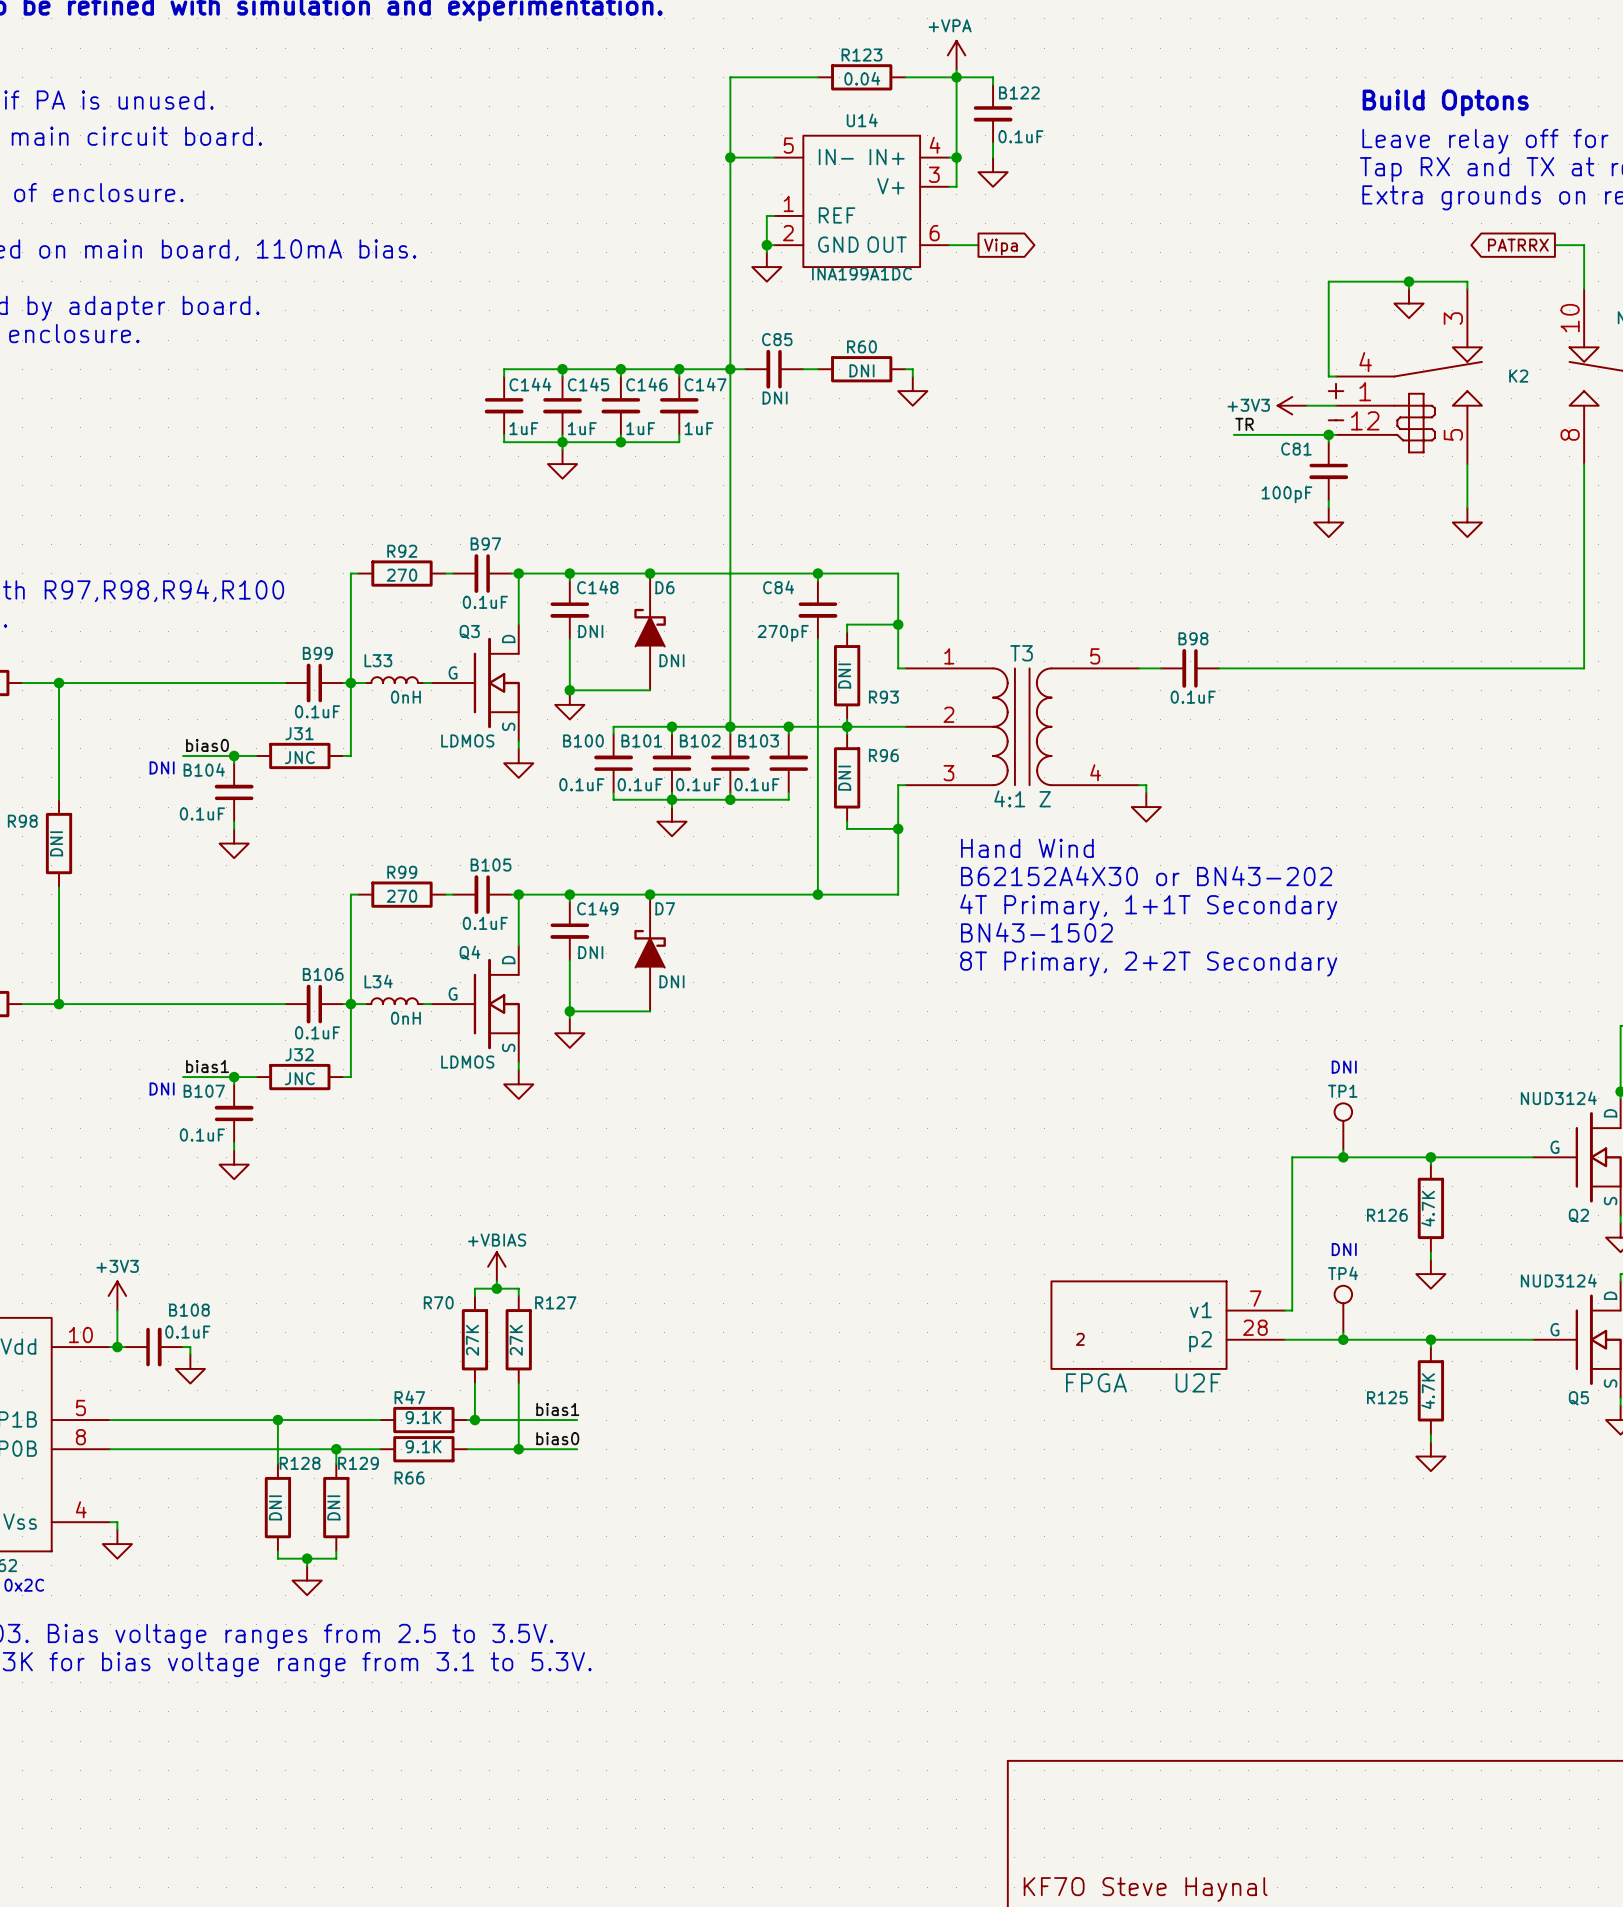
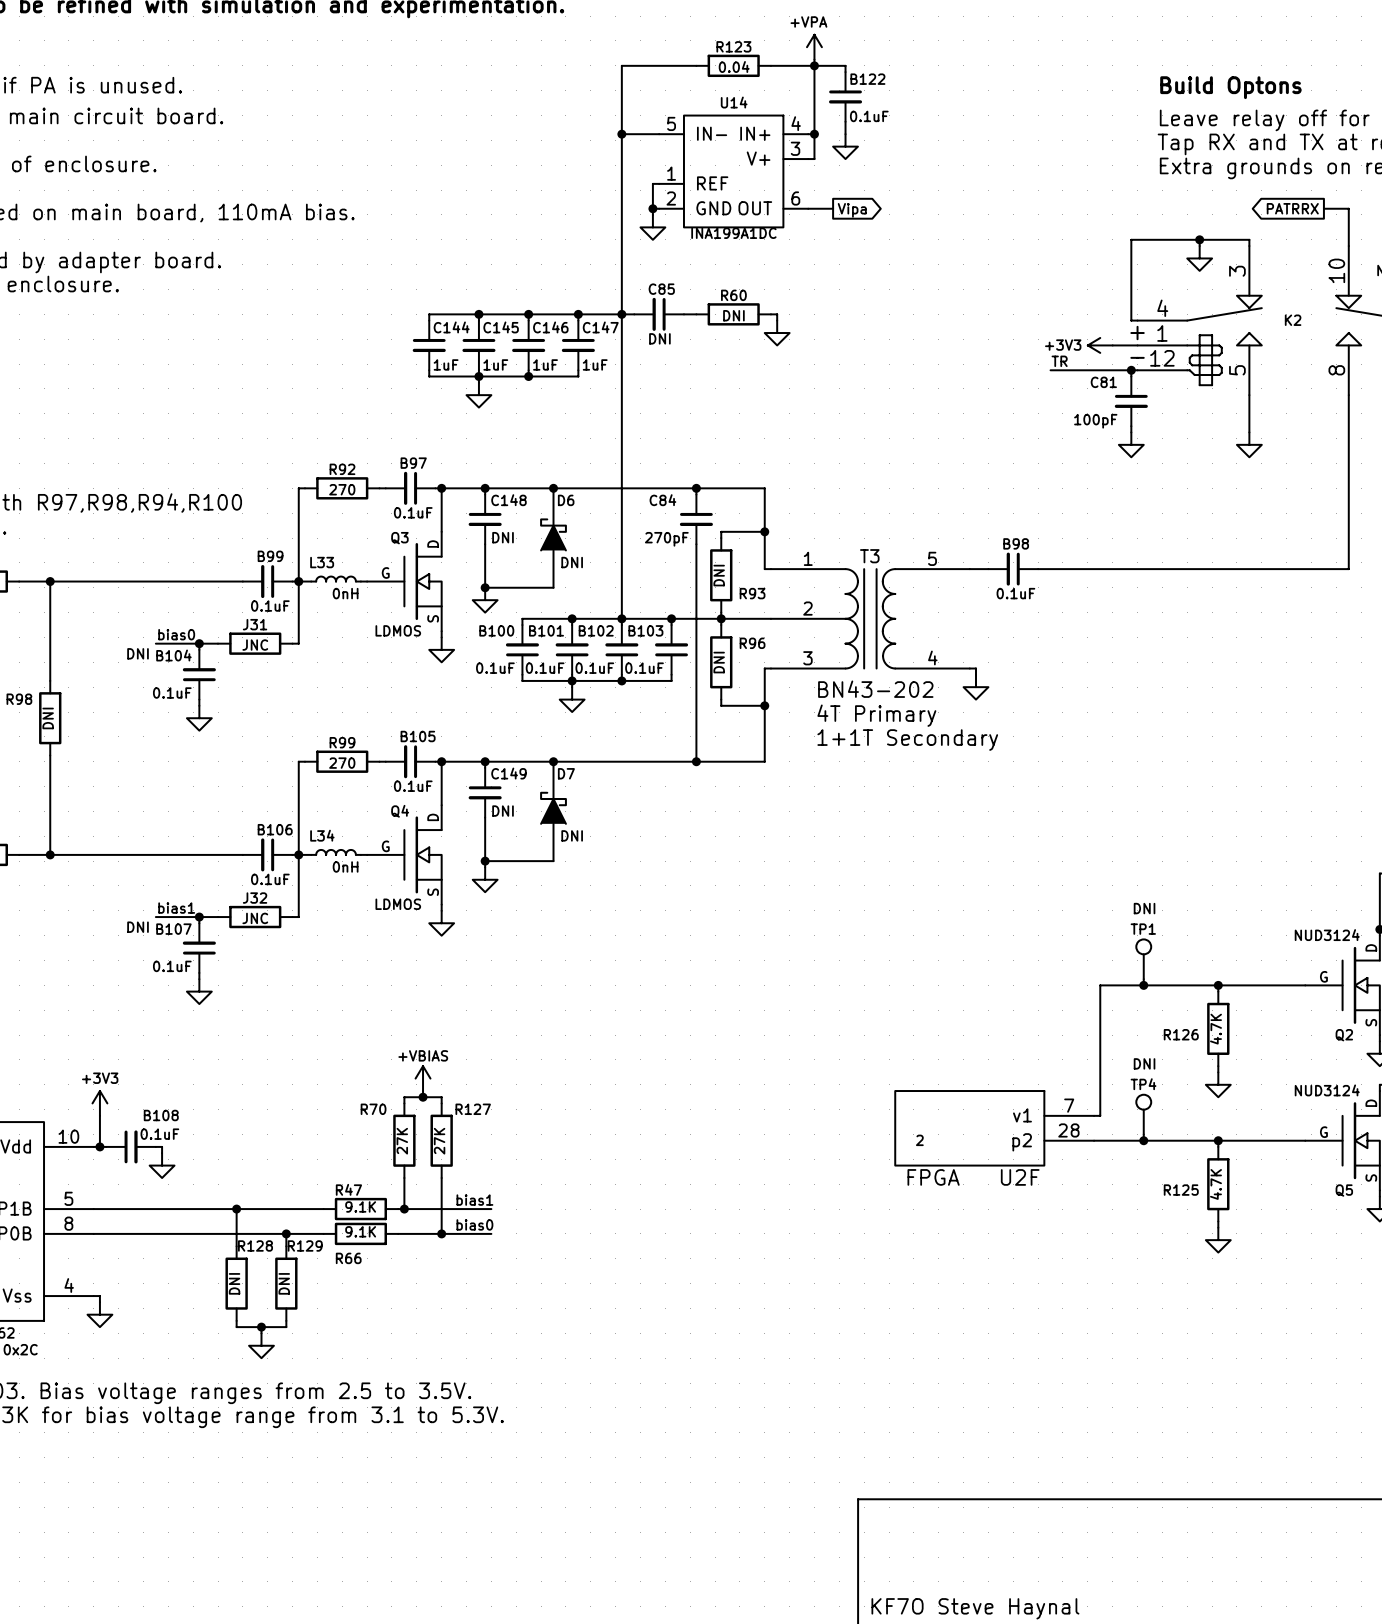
T3 value: 4:1 Z (1022, 798) -> none
text: none -> BN43-202 (875, 689)
text: none -> 4T Primary (876, 715)
text: Hand Wind (1027, 848) -> none
text: none -> 1+1T Secondary (907, 740)
text: B62152A4X30 or BN43-202 (1146, 876) -> none
text: 4T Primary, 1+1T Secondary (1148, 907) -> none
text: BN43-1502 (1036, 932) -> none
text: 8T Primary, 2+2T Secondary (1148, 964) -> none

